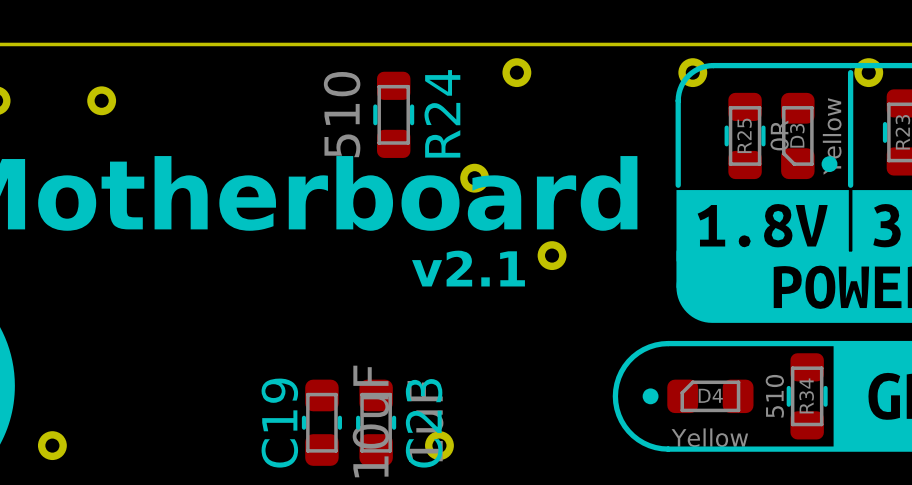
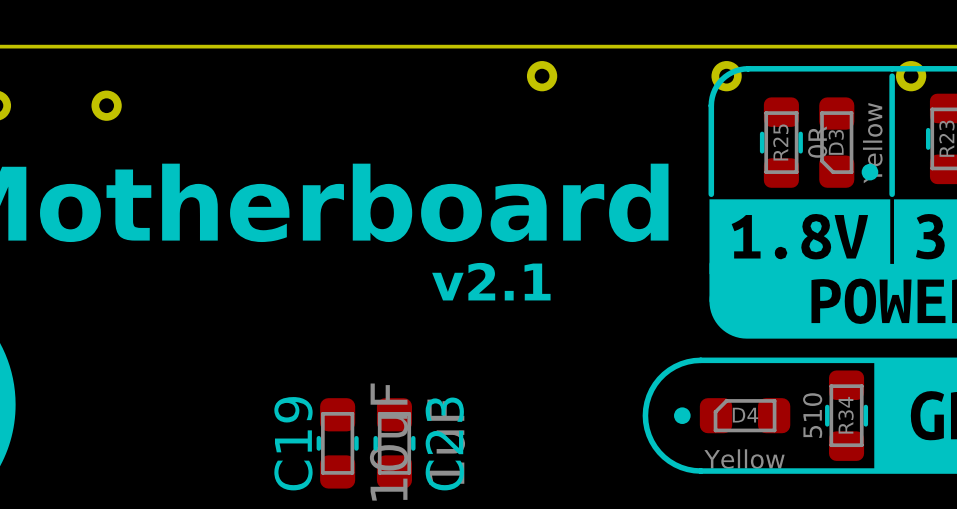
R24: 510 (393, 114) -> none
part: (474, 178) -> none
part: (552, 255) -> none
part: (52, 445) -> none
part: (439, 445) -> none

